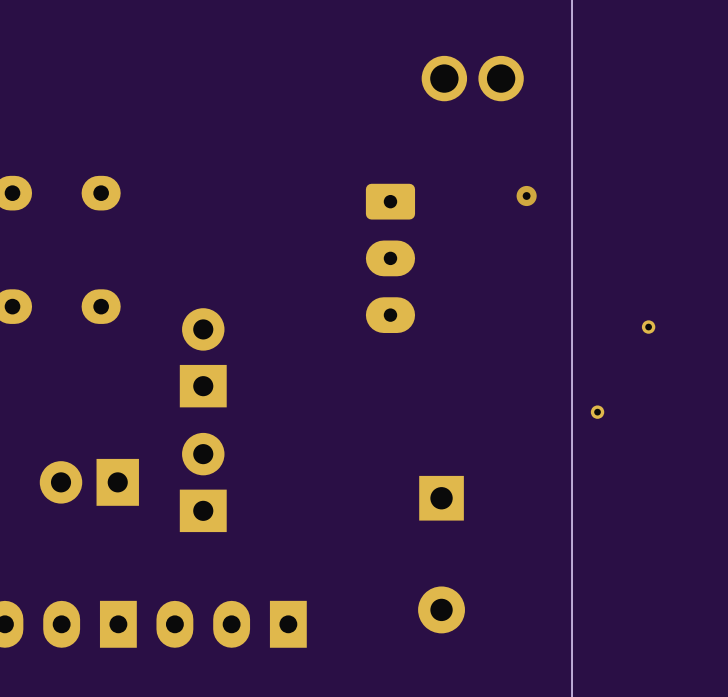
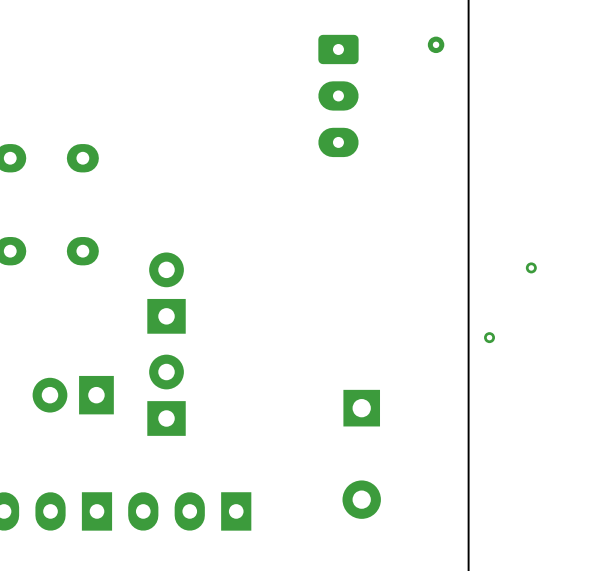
via: none -> (436, 44)
part: (472, 78) -> none
via: (526, 195) -> none
part position: (390, 258) -> (338, 95)

